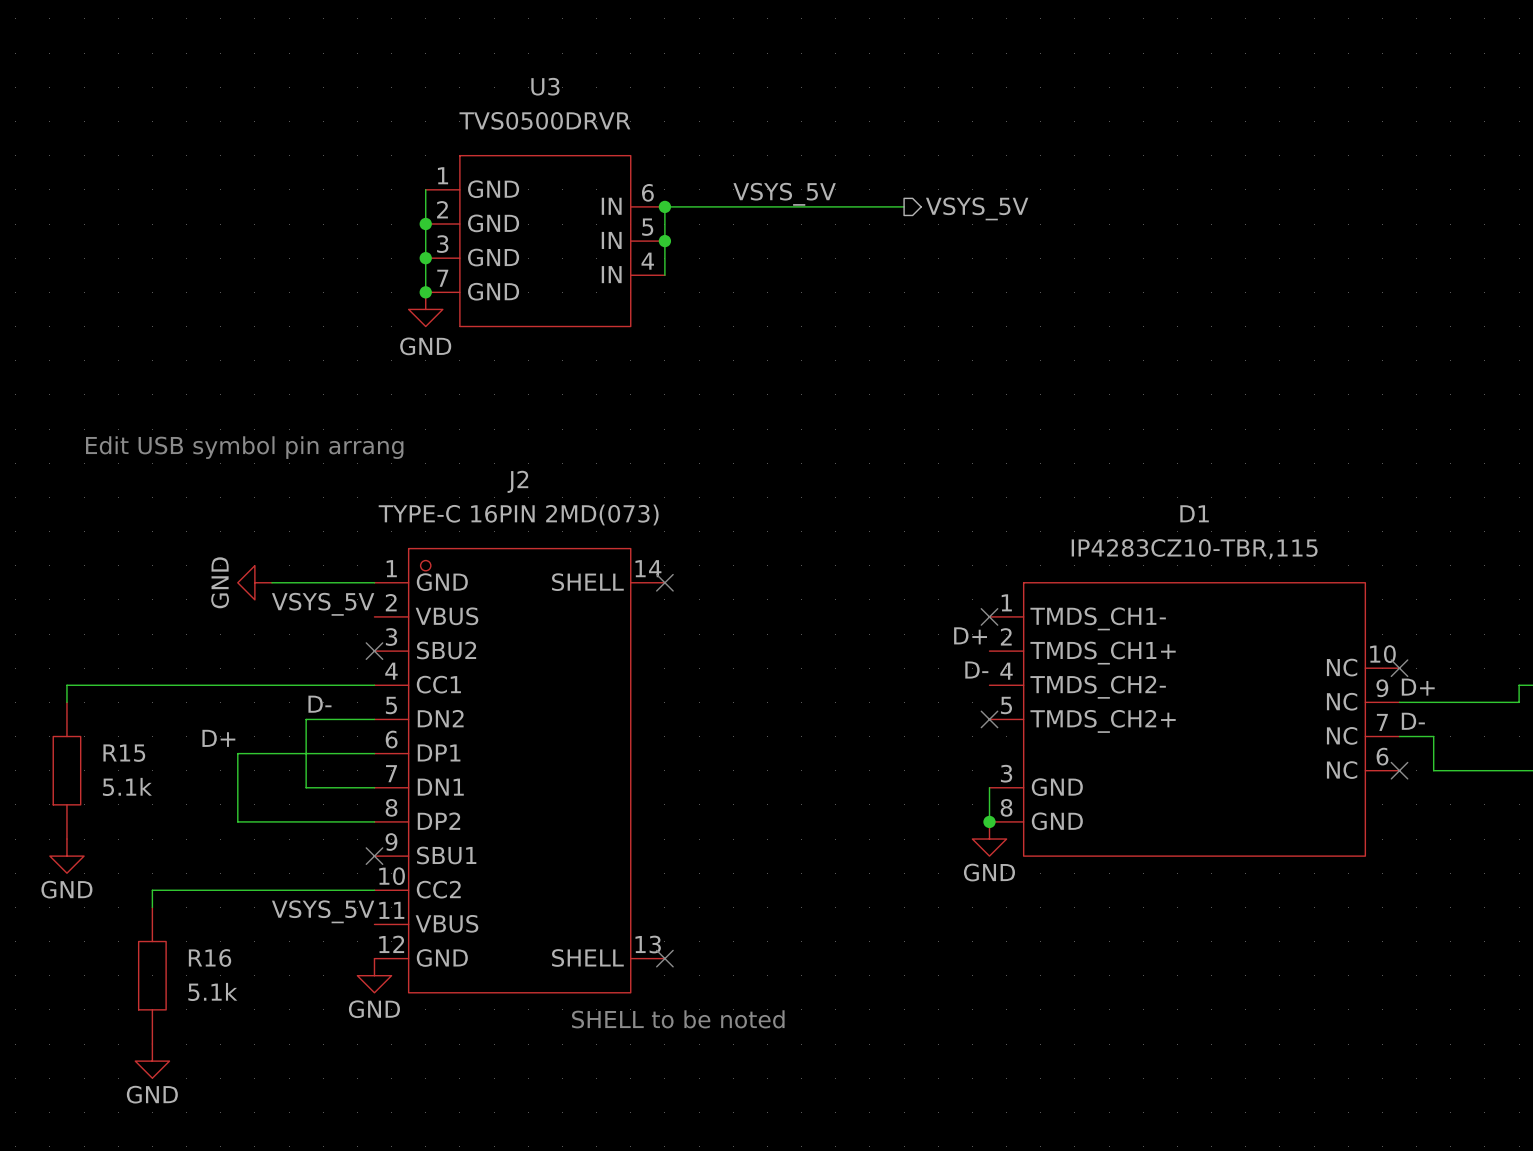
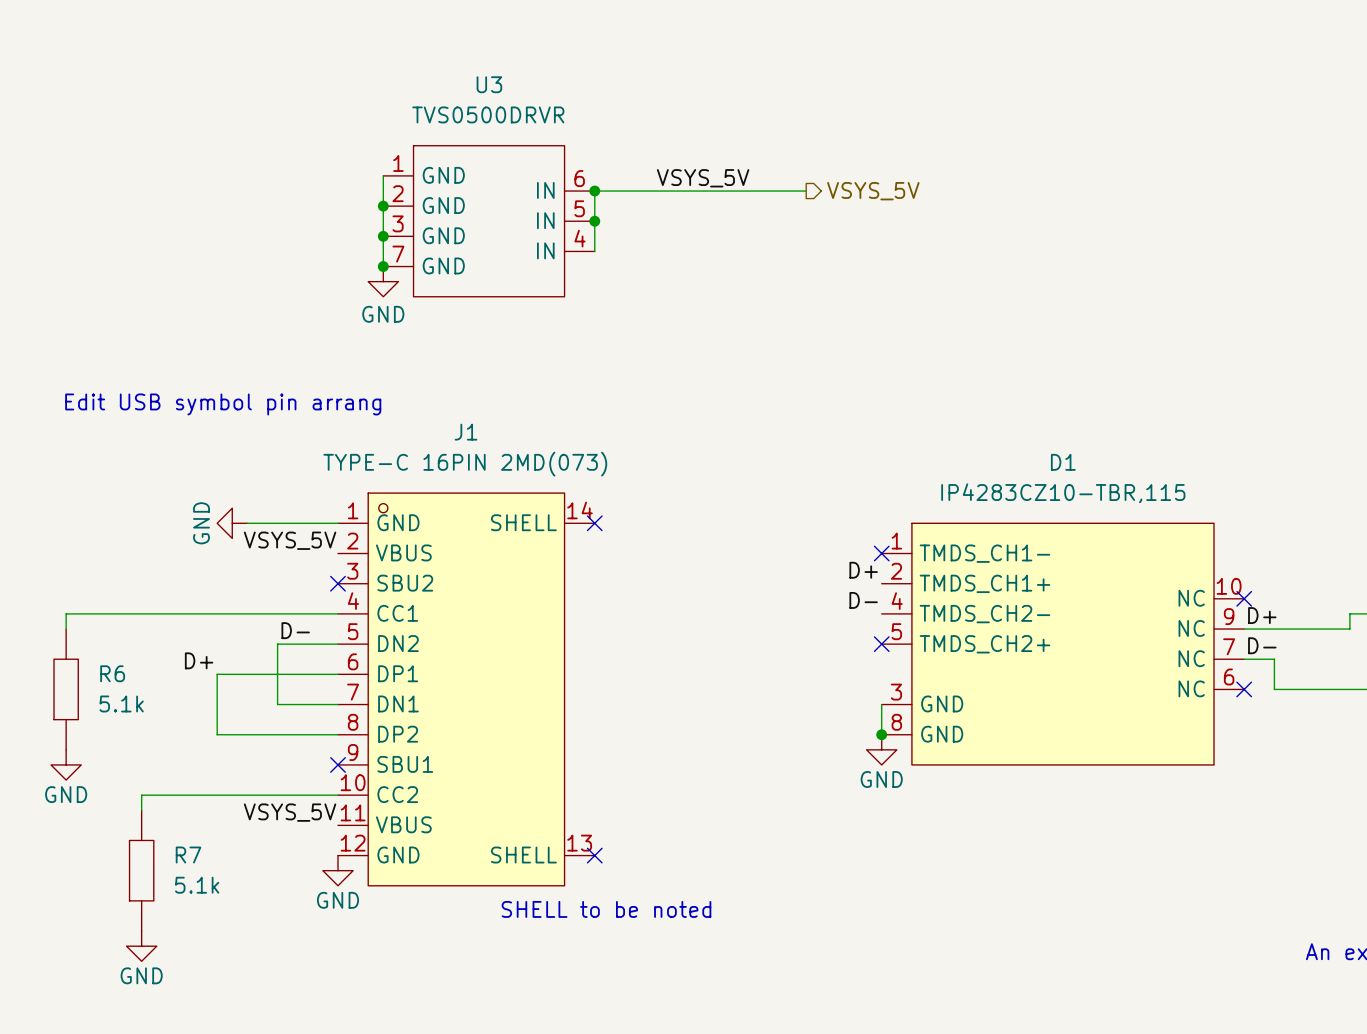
J2 name: J2 (517, 481) -> J1 (466, 432)
R15 name: R15 (124, 753) -> R6 (112, 673)
R16 name: R16 (210, 957) -> R7 (188, 855)

